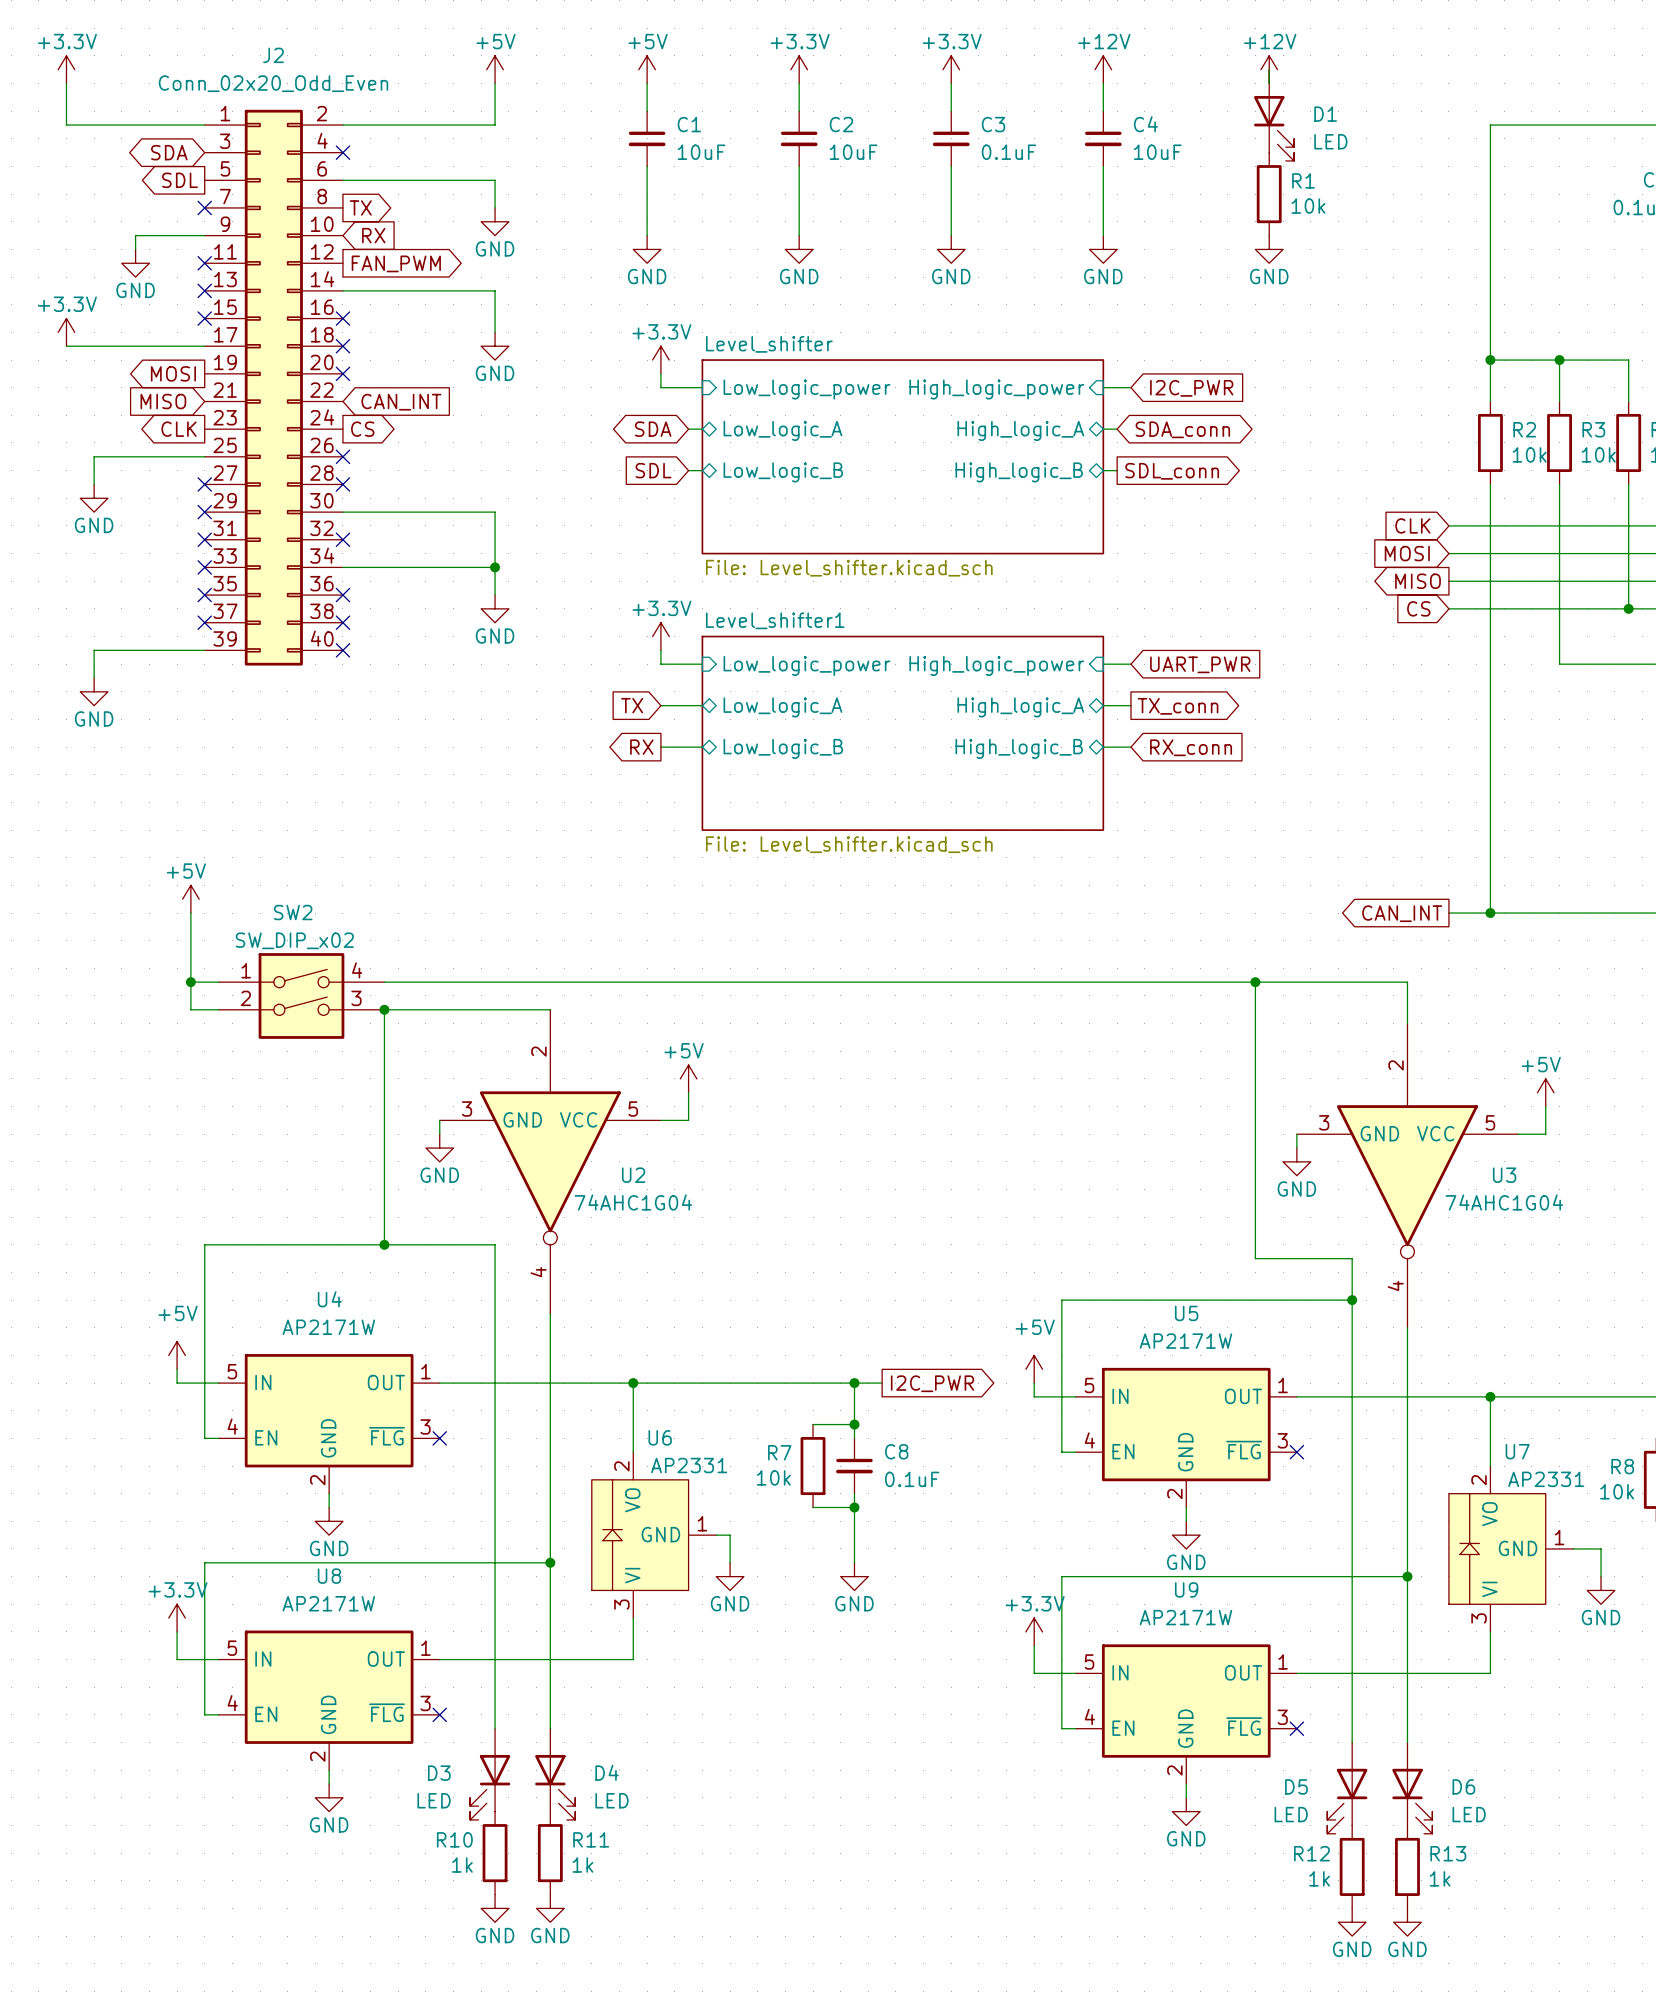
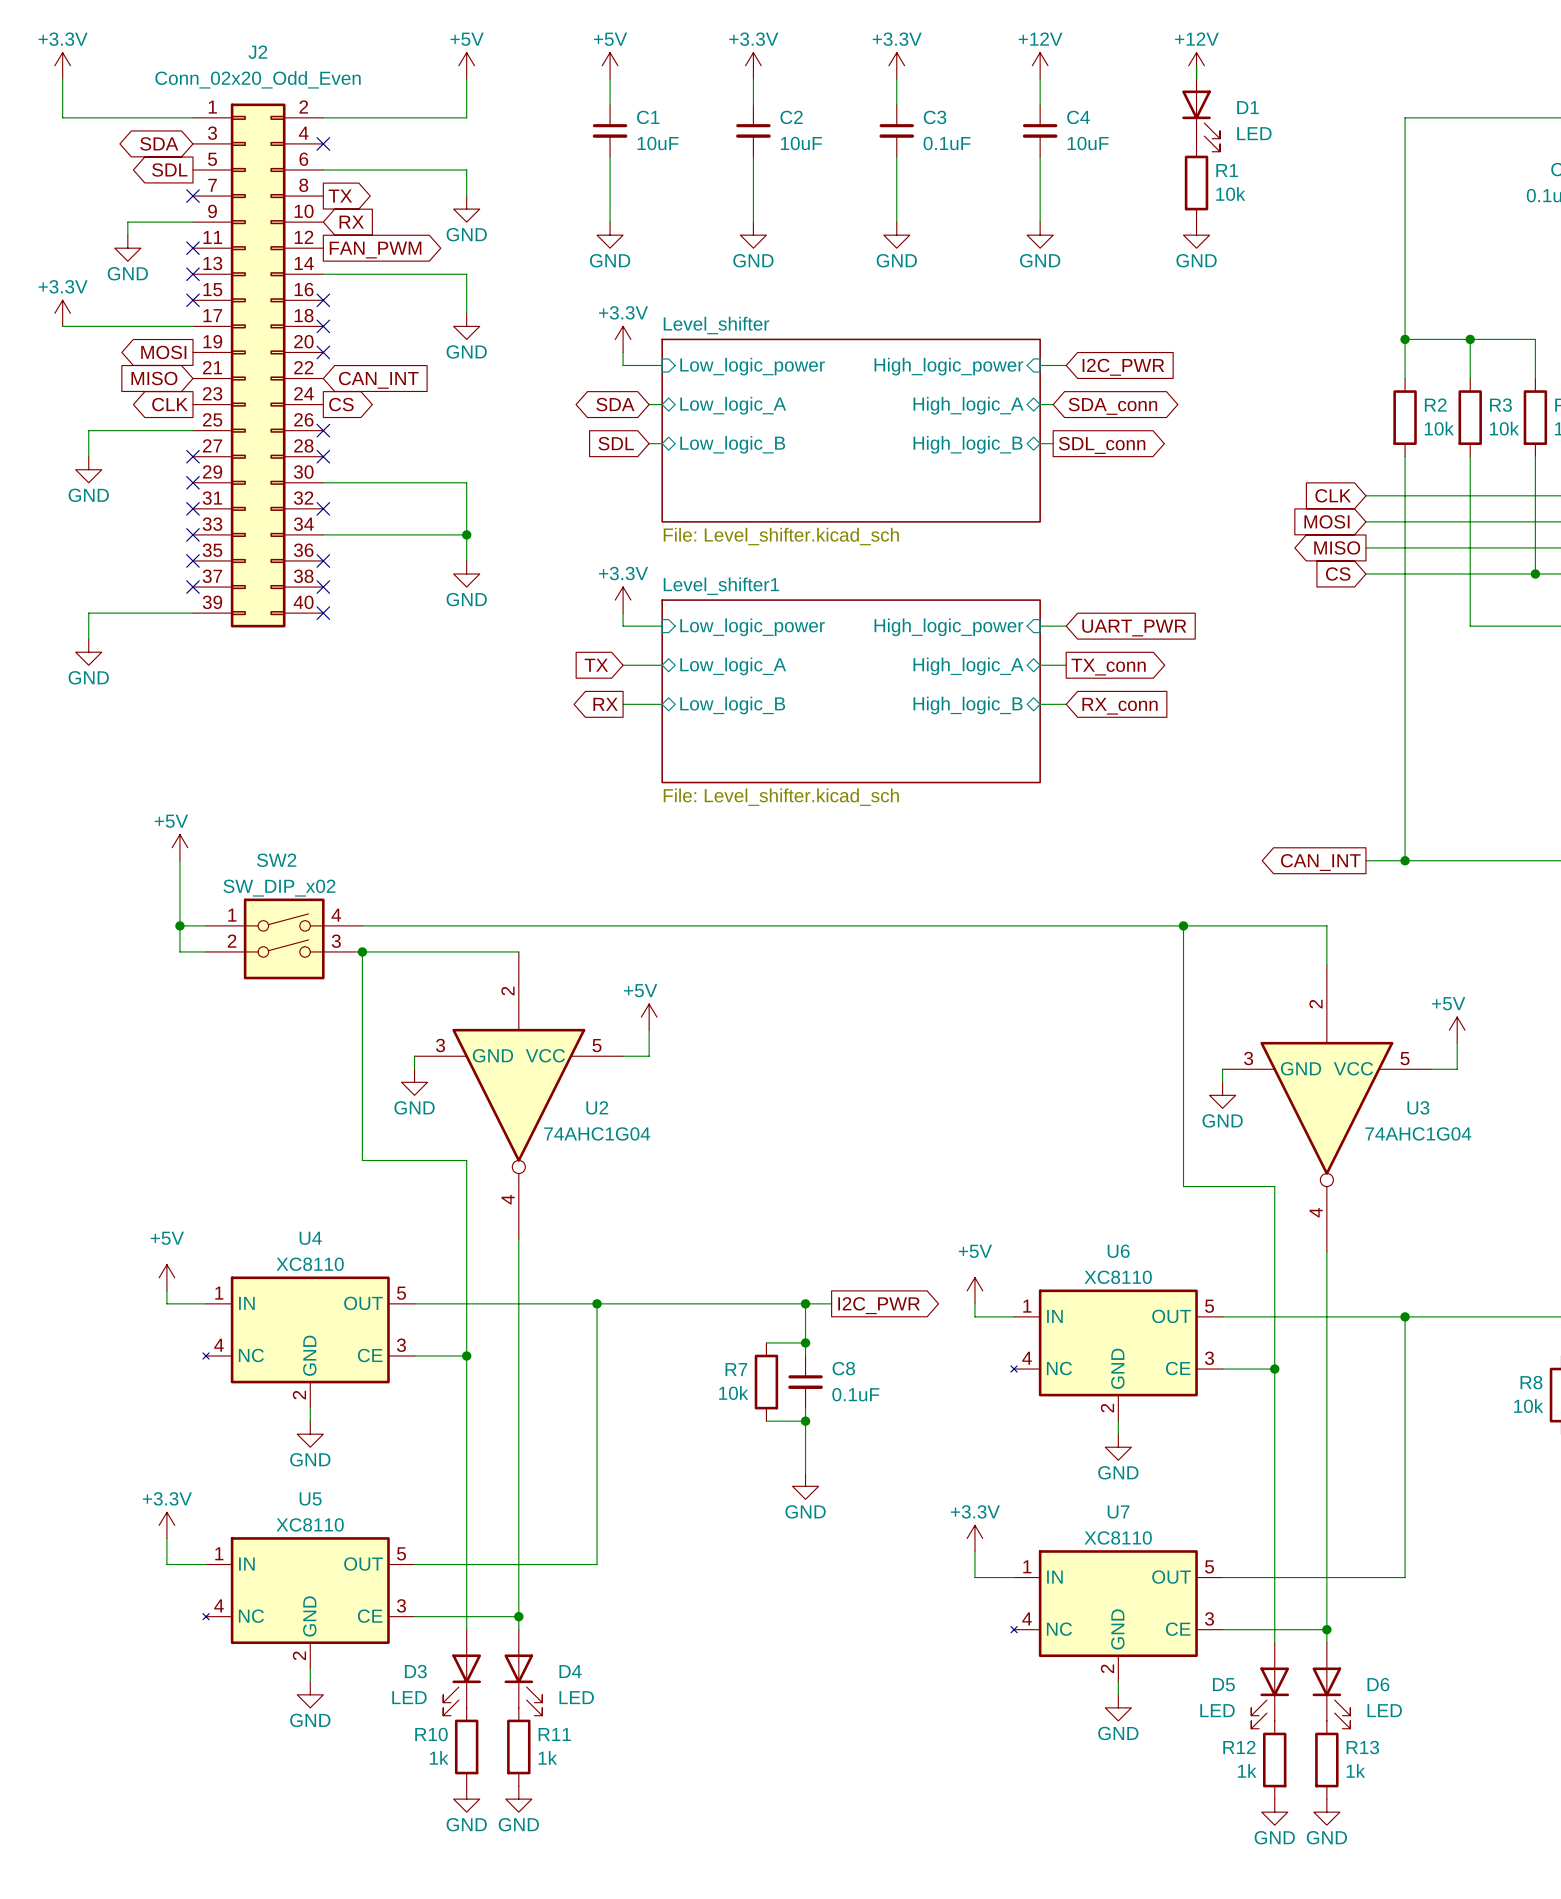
wire: (384, 1231) (384, 1244) -> (362, 1160) (466, 1160) (466, 1173)
junction: (384, 1244) -> none
wire: (495, 1244) (204, 1244) (204, 1438) (218, 1438) -> none
wire: (1352, 1300) (1061, 1300) (1061, 1452) (1075, 1452) -> none
junction: (1352, 1300) -> none
U4 value: AP2171W (328, 1327) -> XC8110 (310, 1264)
U5 value: AP2171W (1185, 1341) -> XC8110 (310, 1524)
U4 symbol: [218, 1354, 440, 1494] -> [202, 1276, 415, 1409]
U5 symbol: [1075, 1367, 1297, 1508] -> [202, 1537, 415, 1669]
wire: none -> (414, 1355) (466, 1355)
no-connect mark: (439, 1438) -> none
junction: none -> (466, 1355)
U6 symbol: [591, 1452, 717, 1619] -> [1010, 1289, 1223, 1422]
wire: none -> (1222, 1369) (1274, 1369)
no-connect mark: (1296, 1452) -> none
junction: none -> (1274, 1369)
U6 value: AP2331 (689, 1465) -> XC8110 (1118, 1277)
U7 symbol: [1448, 1466, 1574, 1632] -> [1010, 1550, 1223, 1682]
U7 value: AP2331 (1546, 1479) -> XC8110 (1118, 1537)
wire: (716, 1535) (730, 1535) (730, 1562) -> none
wire: (1573, 1548) (1601, 1548) (1601, 1576) -> none
wire: (550, 1562) (204, 1562) (204, 1714) (218, 1714) -> none
junction: (550, 1562) -> none
power symbol: GND (730, 1576) -> none
wire: (1407, 1576) (1061, 1576) (1061, 1728) (1075, 1728) -> none
junction: (1407, 1576) -> none
power symbol: GND (1601, 1590) -> none
U8: AP2171W (329, 1700) -> none
wire: none -> (414, 1616) (518, 1616)
no-connect mark: (439, 1714) -> none
junction: none -> (518, 1616)
U9: AP2171W (1186, 1714) -> none
wire: none -> (1222, 1629) (1326, 1629)
no-connect mark: (1296, 1728) -> none
junction: none -> (1326, 1629)

